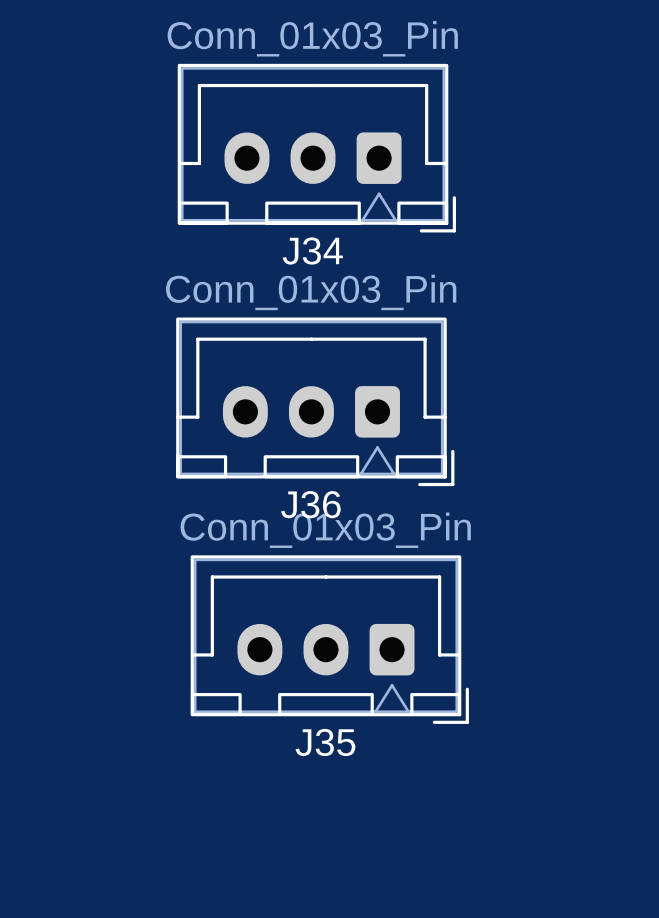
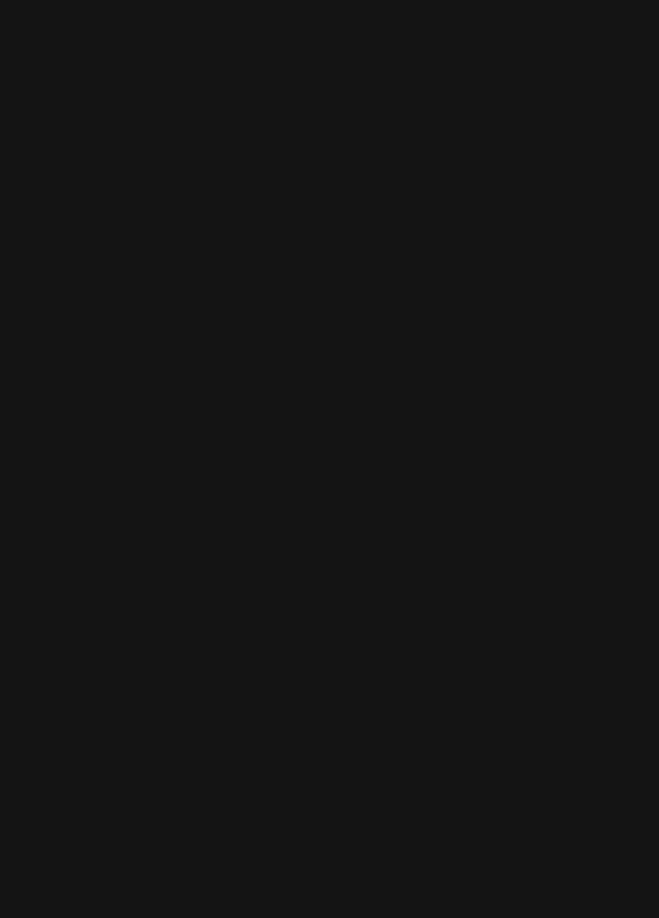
J34: Conn_01x03_Pin (316, 148) -> none
J36: Conn_01x03_Pin (315, 401) -> none
J35: Conn_01x03_Pin (329, 639) -> none

